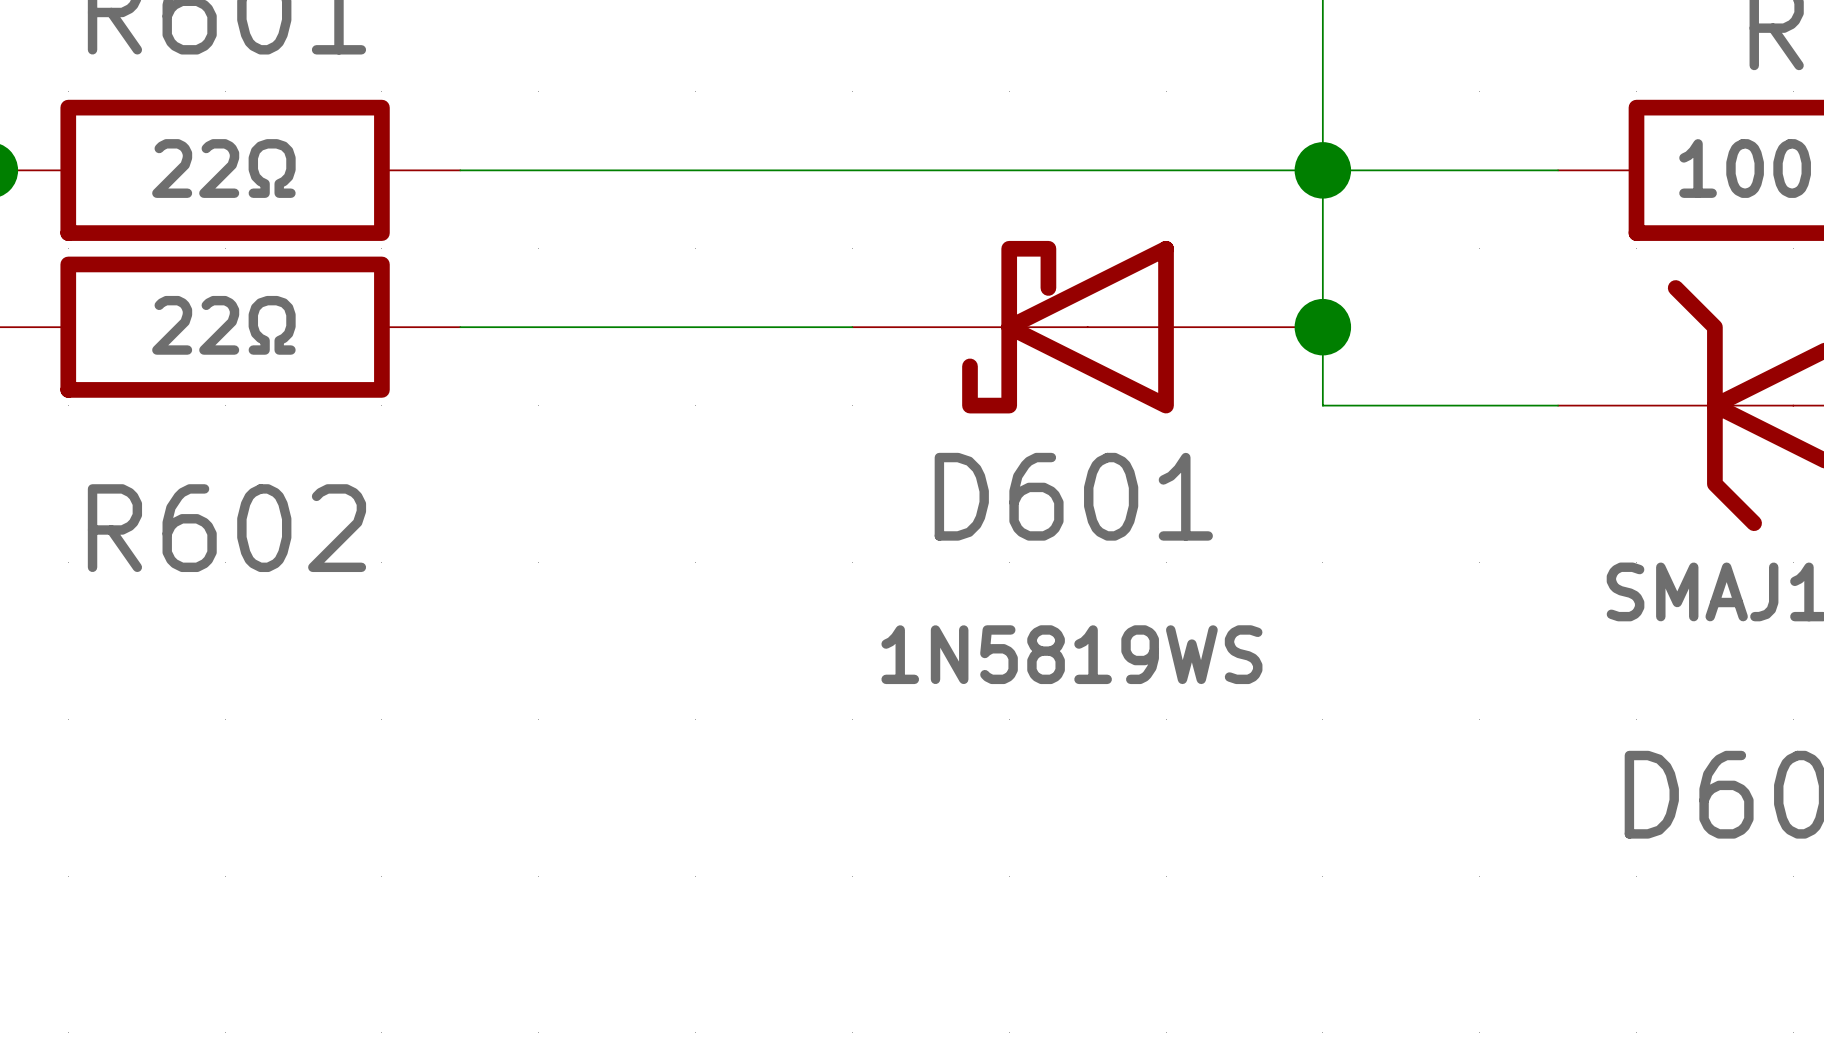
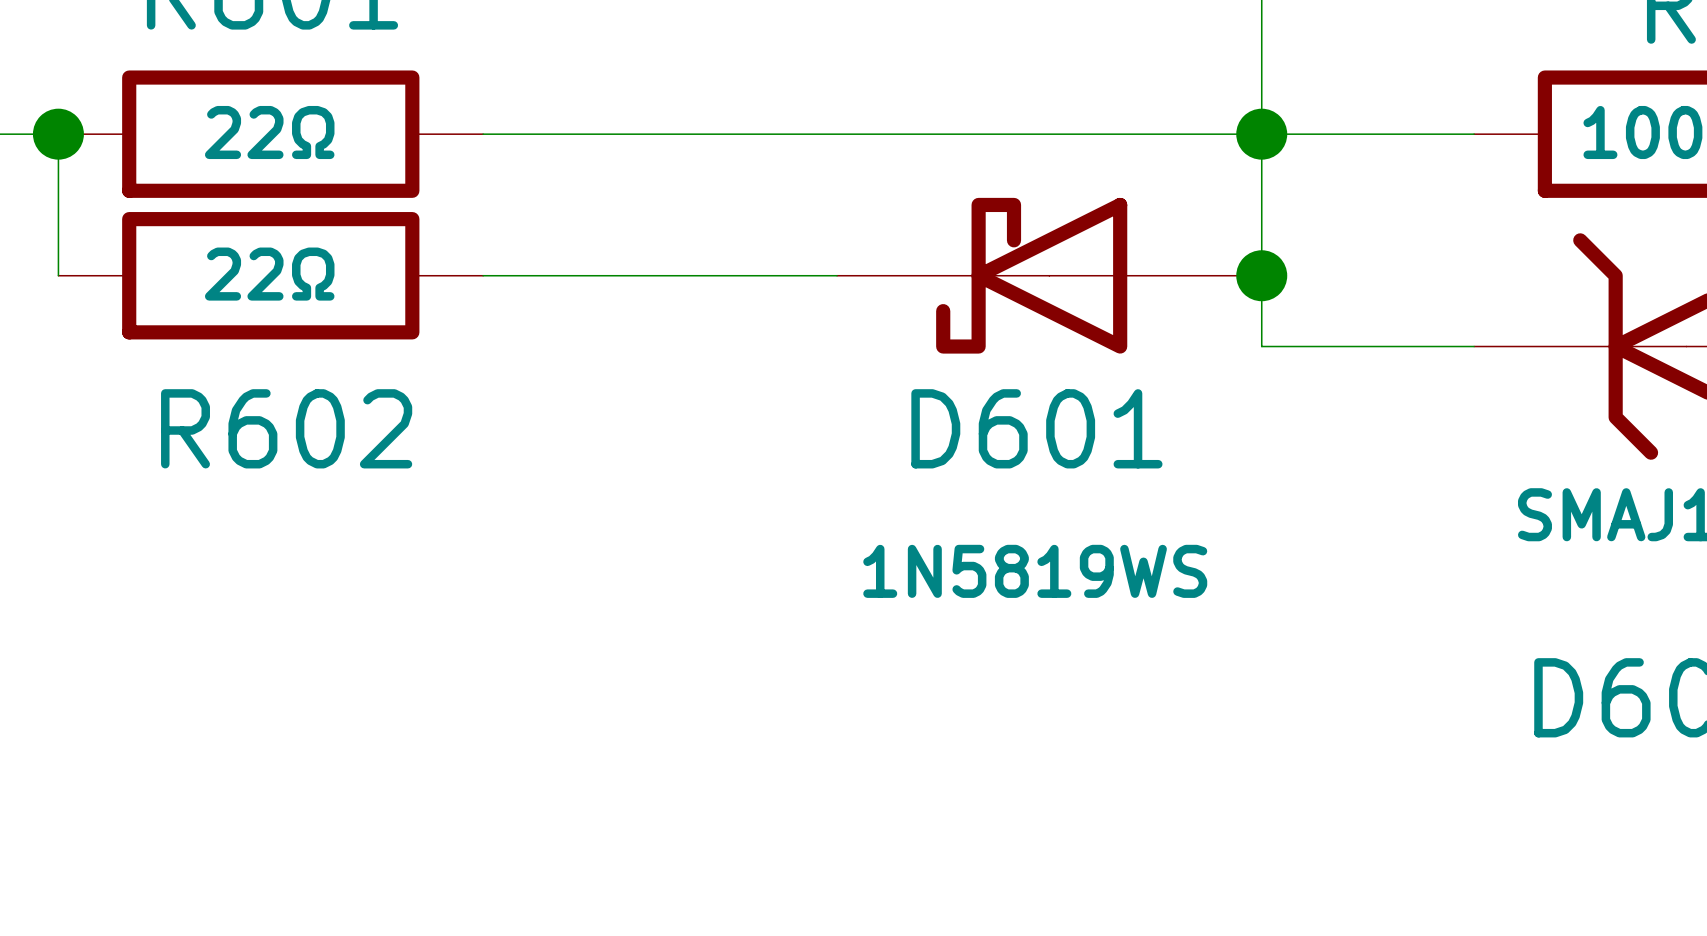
R602 name position: R602 (226, 528) -> R602 (286, 428)

